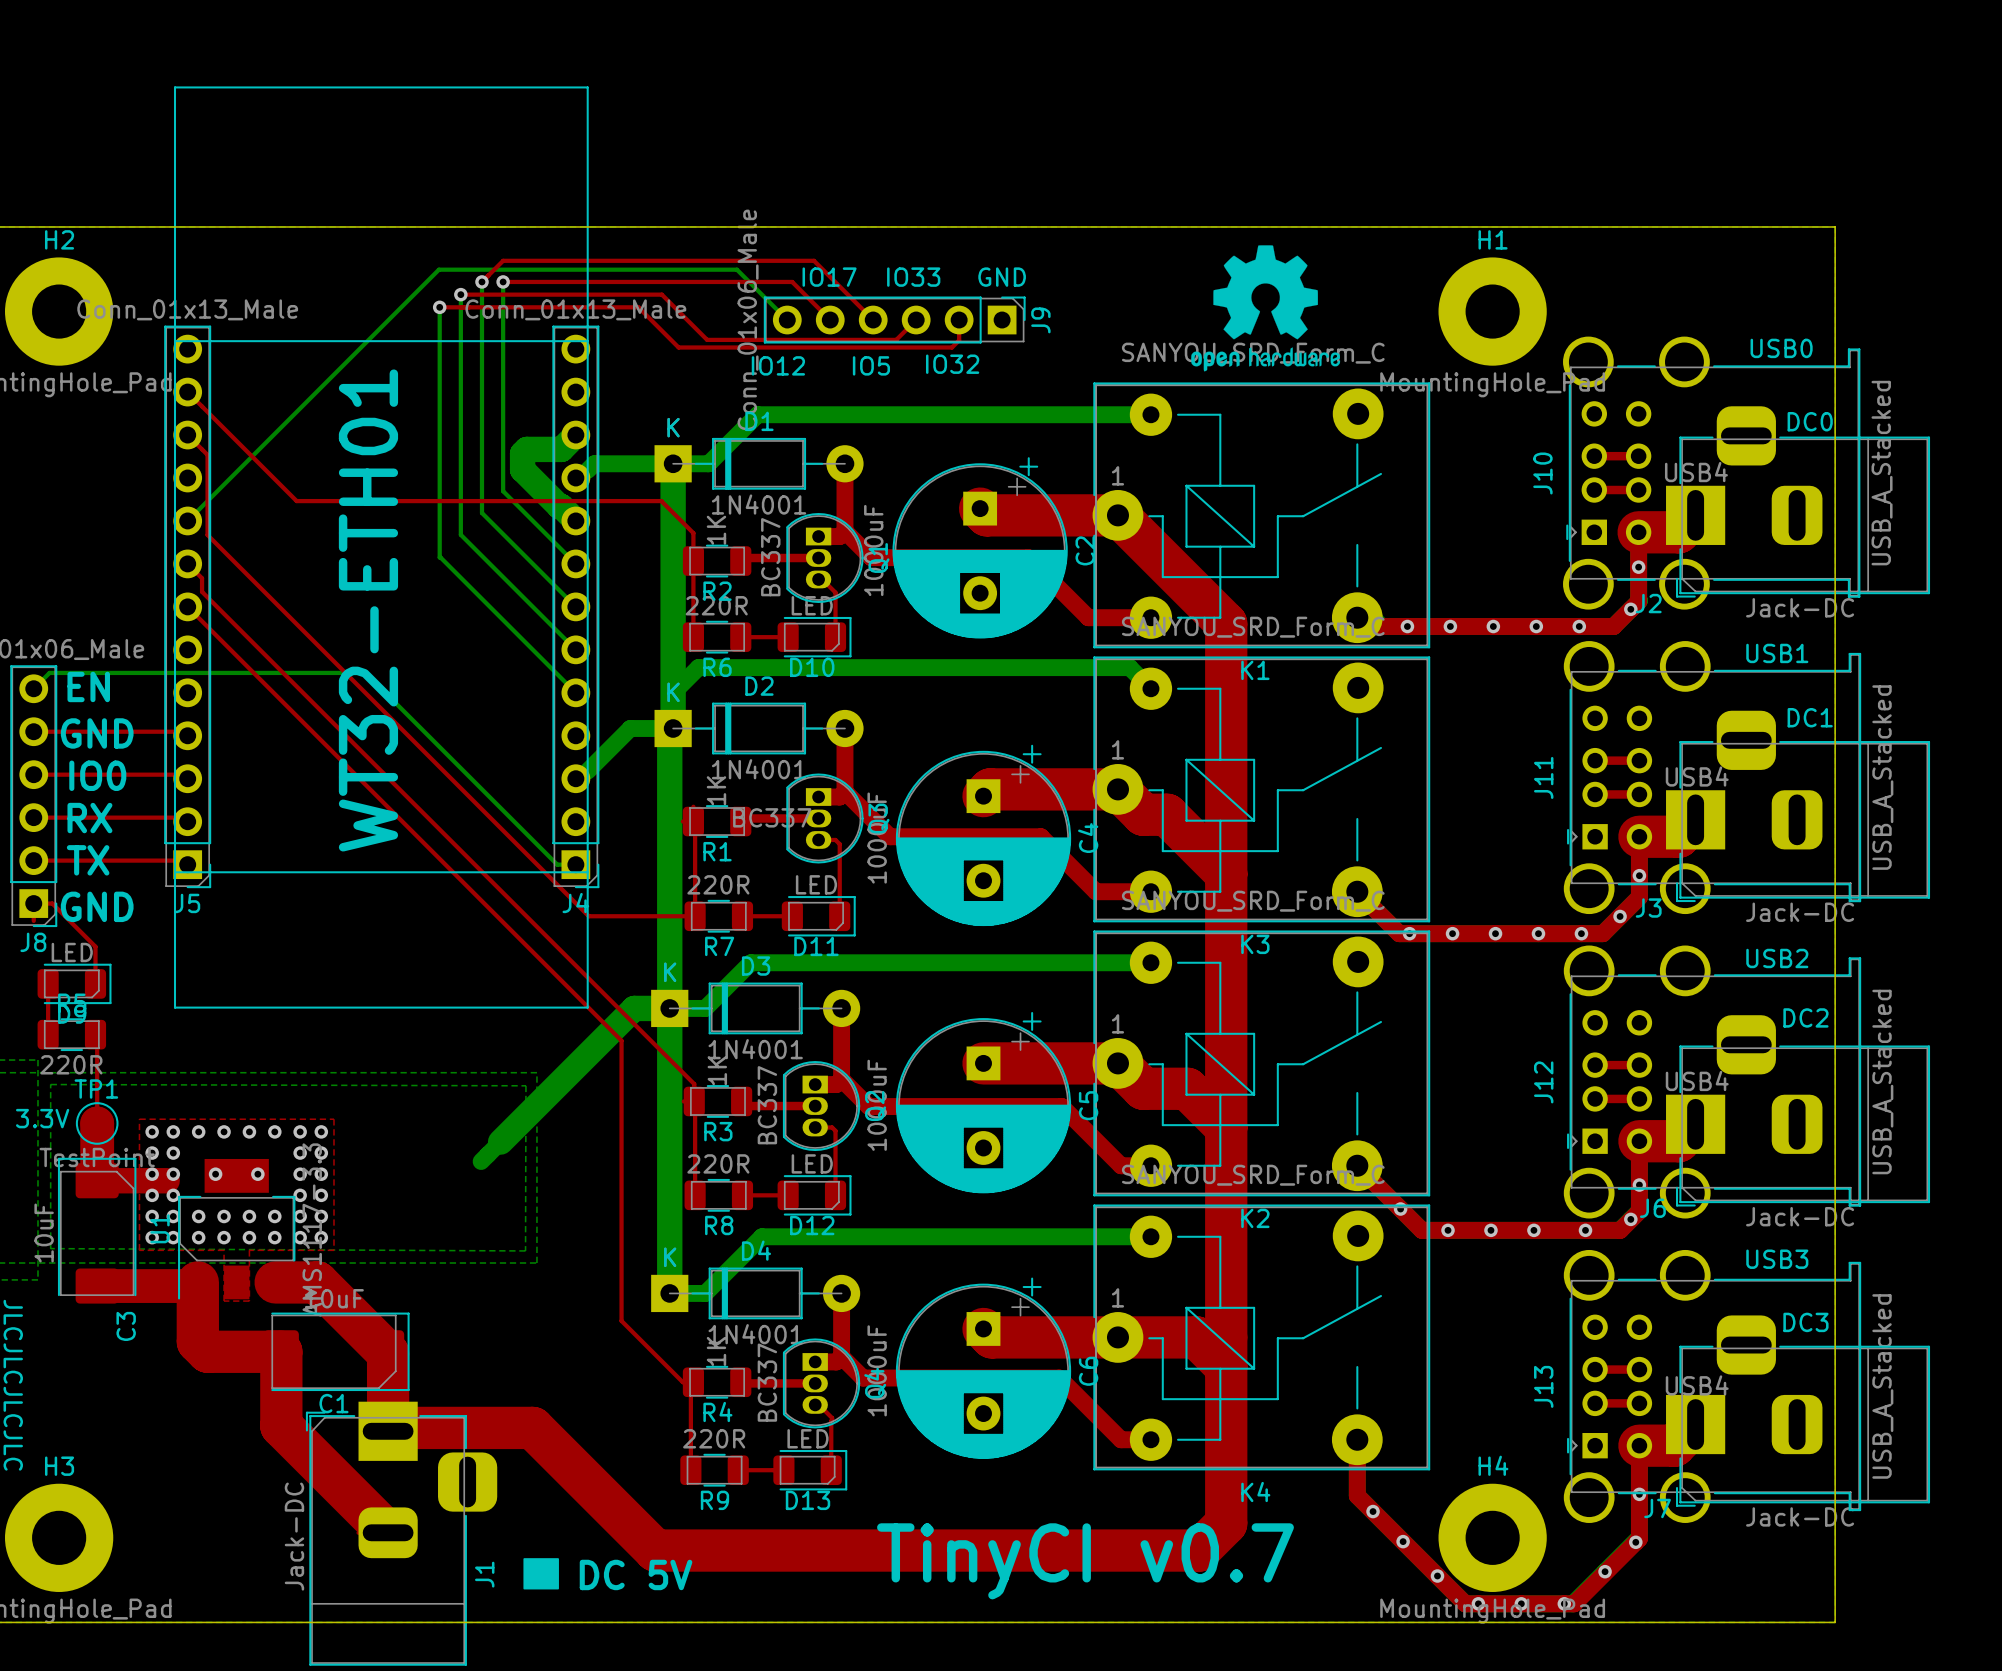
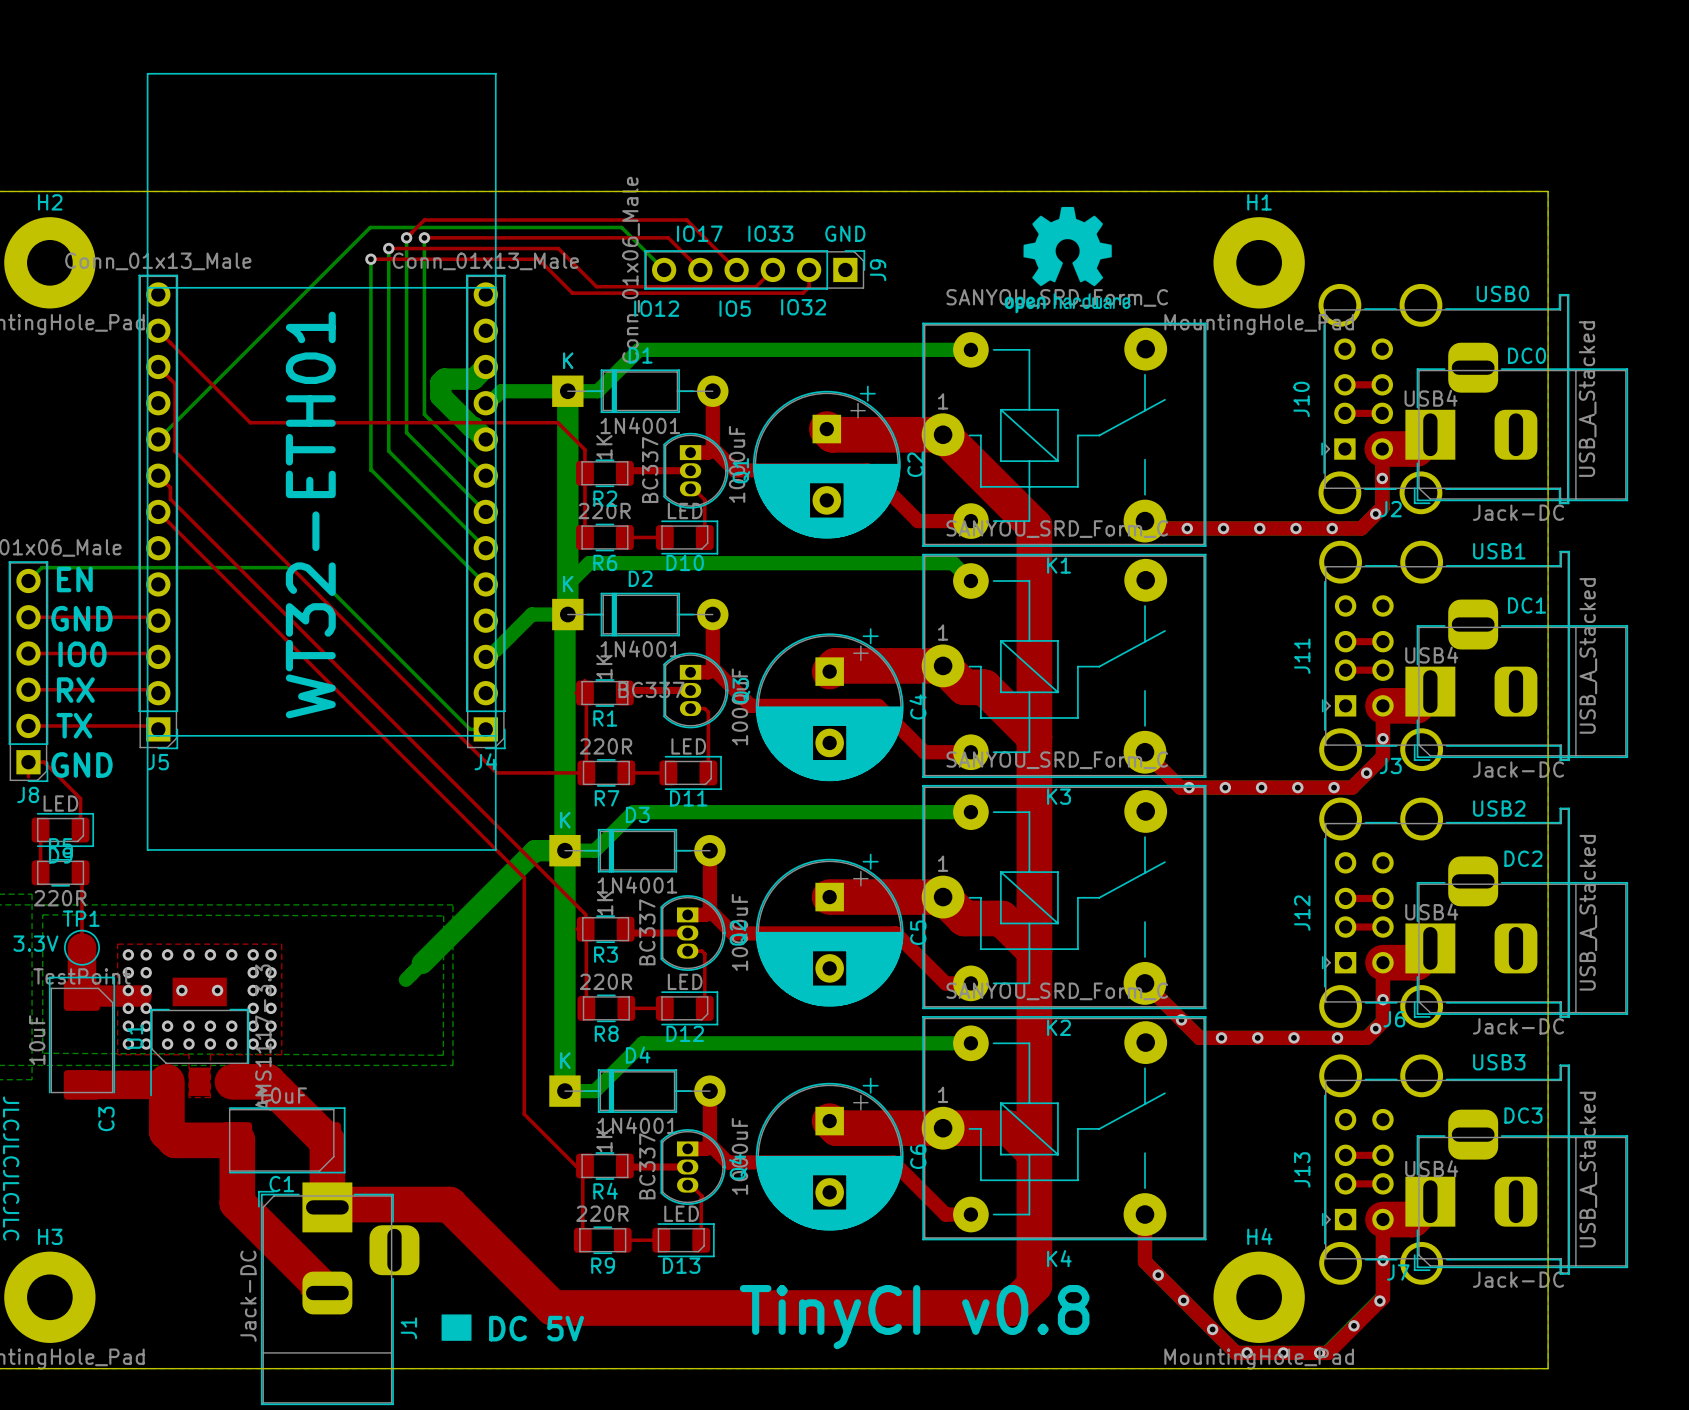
text: TinyCI v0.7 (1085, 1561) -> TinyCI v0.8 (914, 1317)

